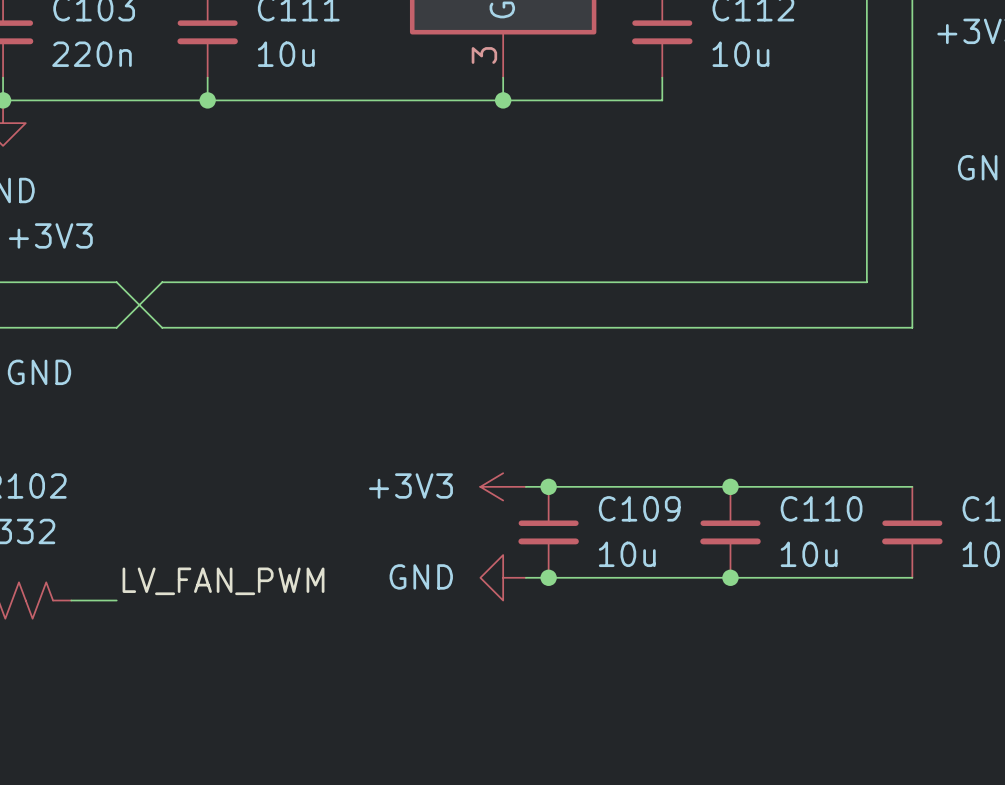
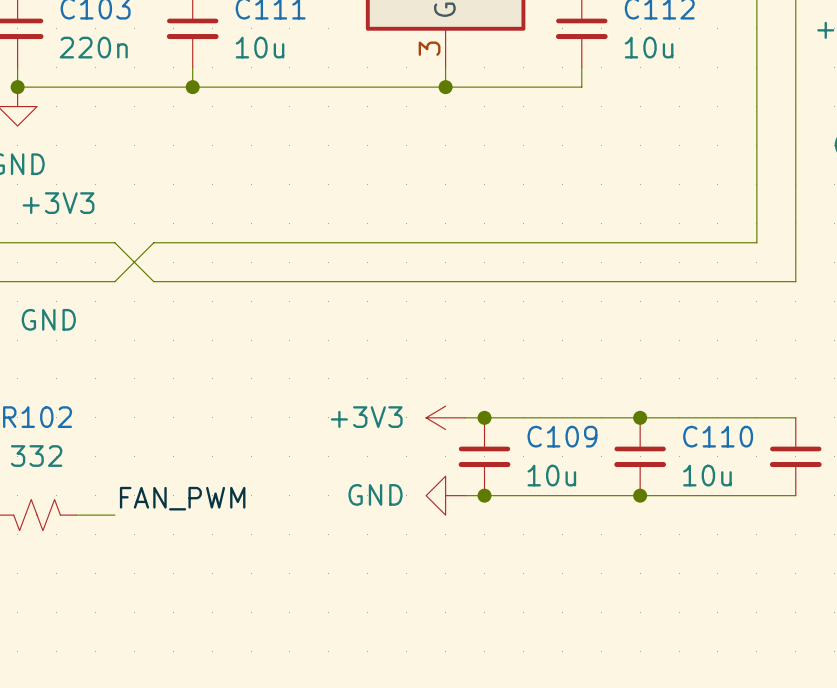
label: LV_FAN_PWM (223, 581) -> FAN_PWM (182, 498)

